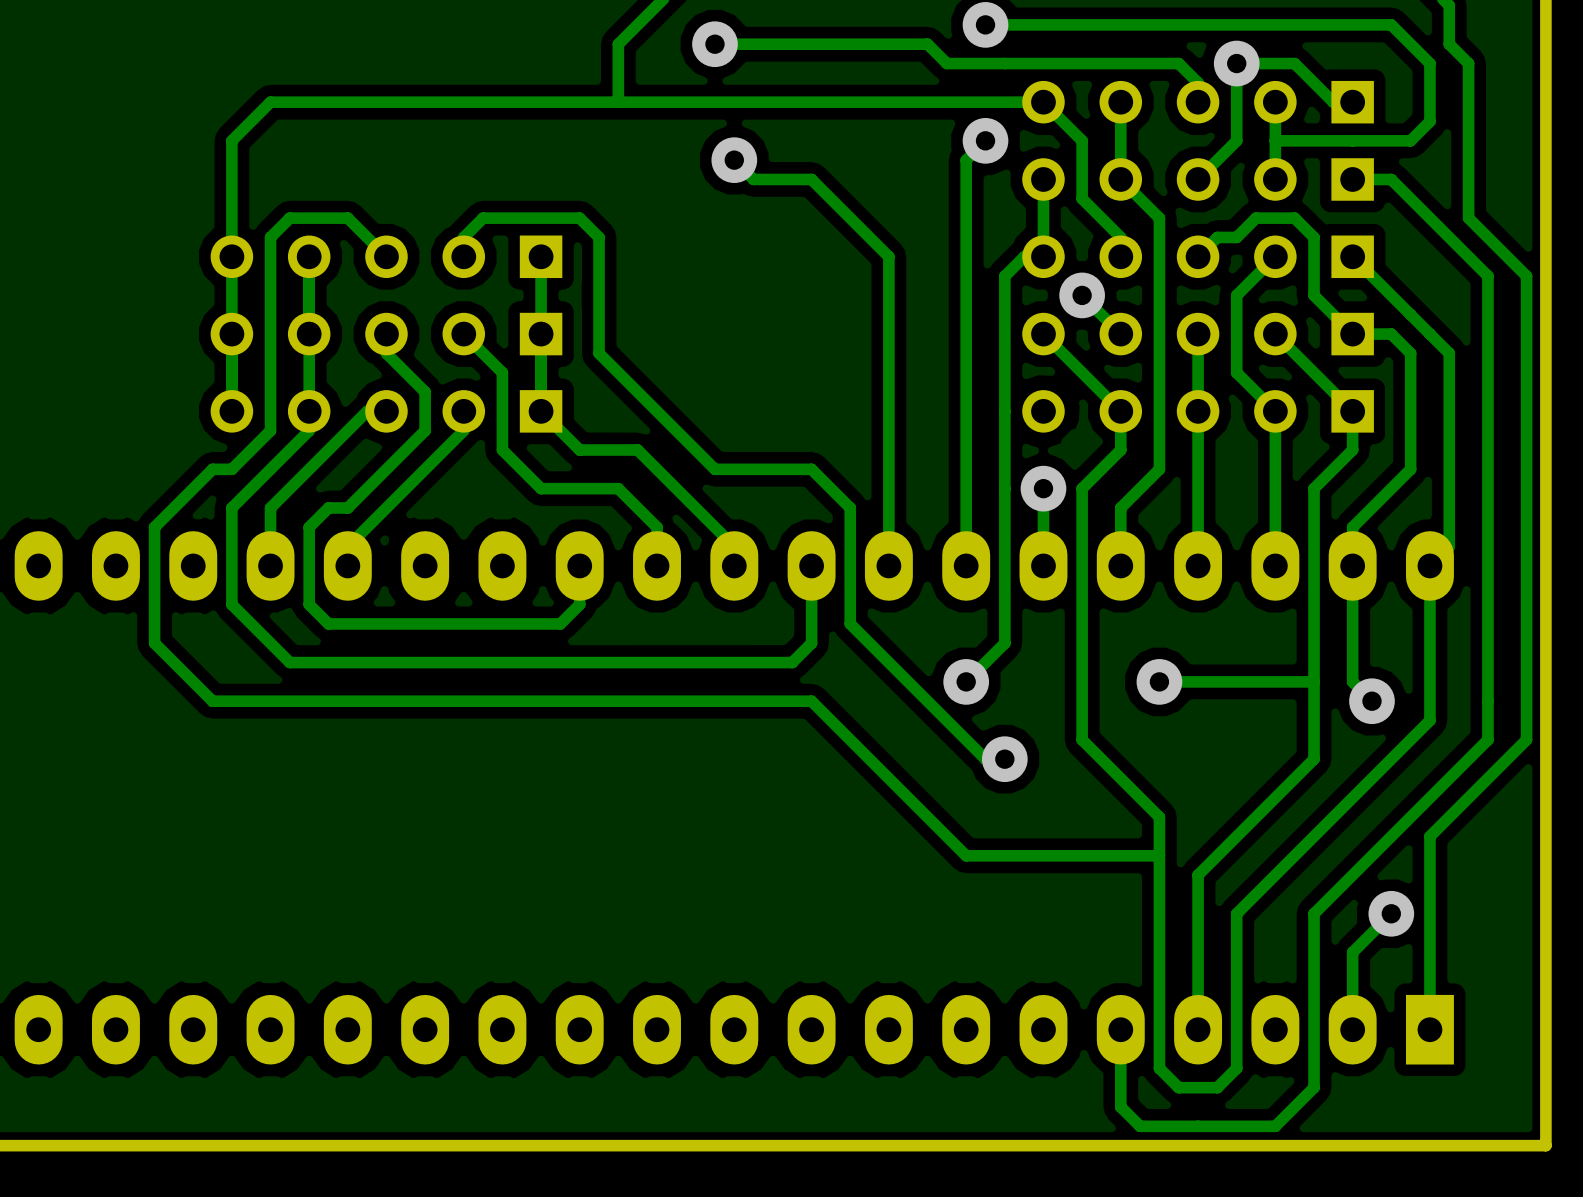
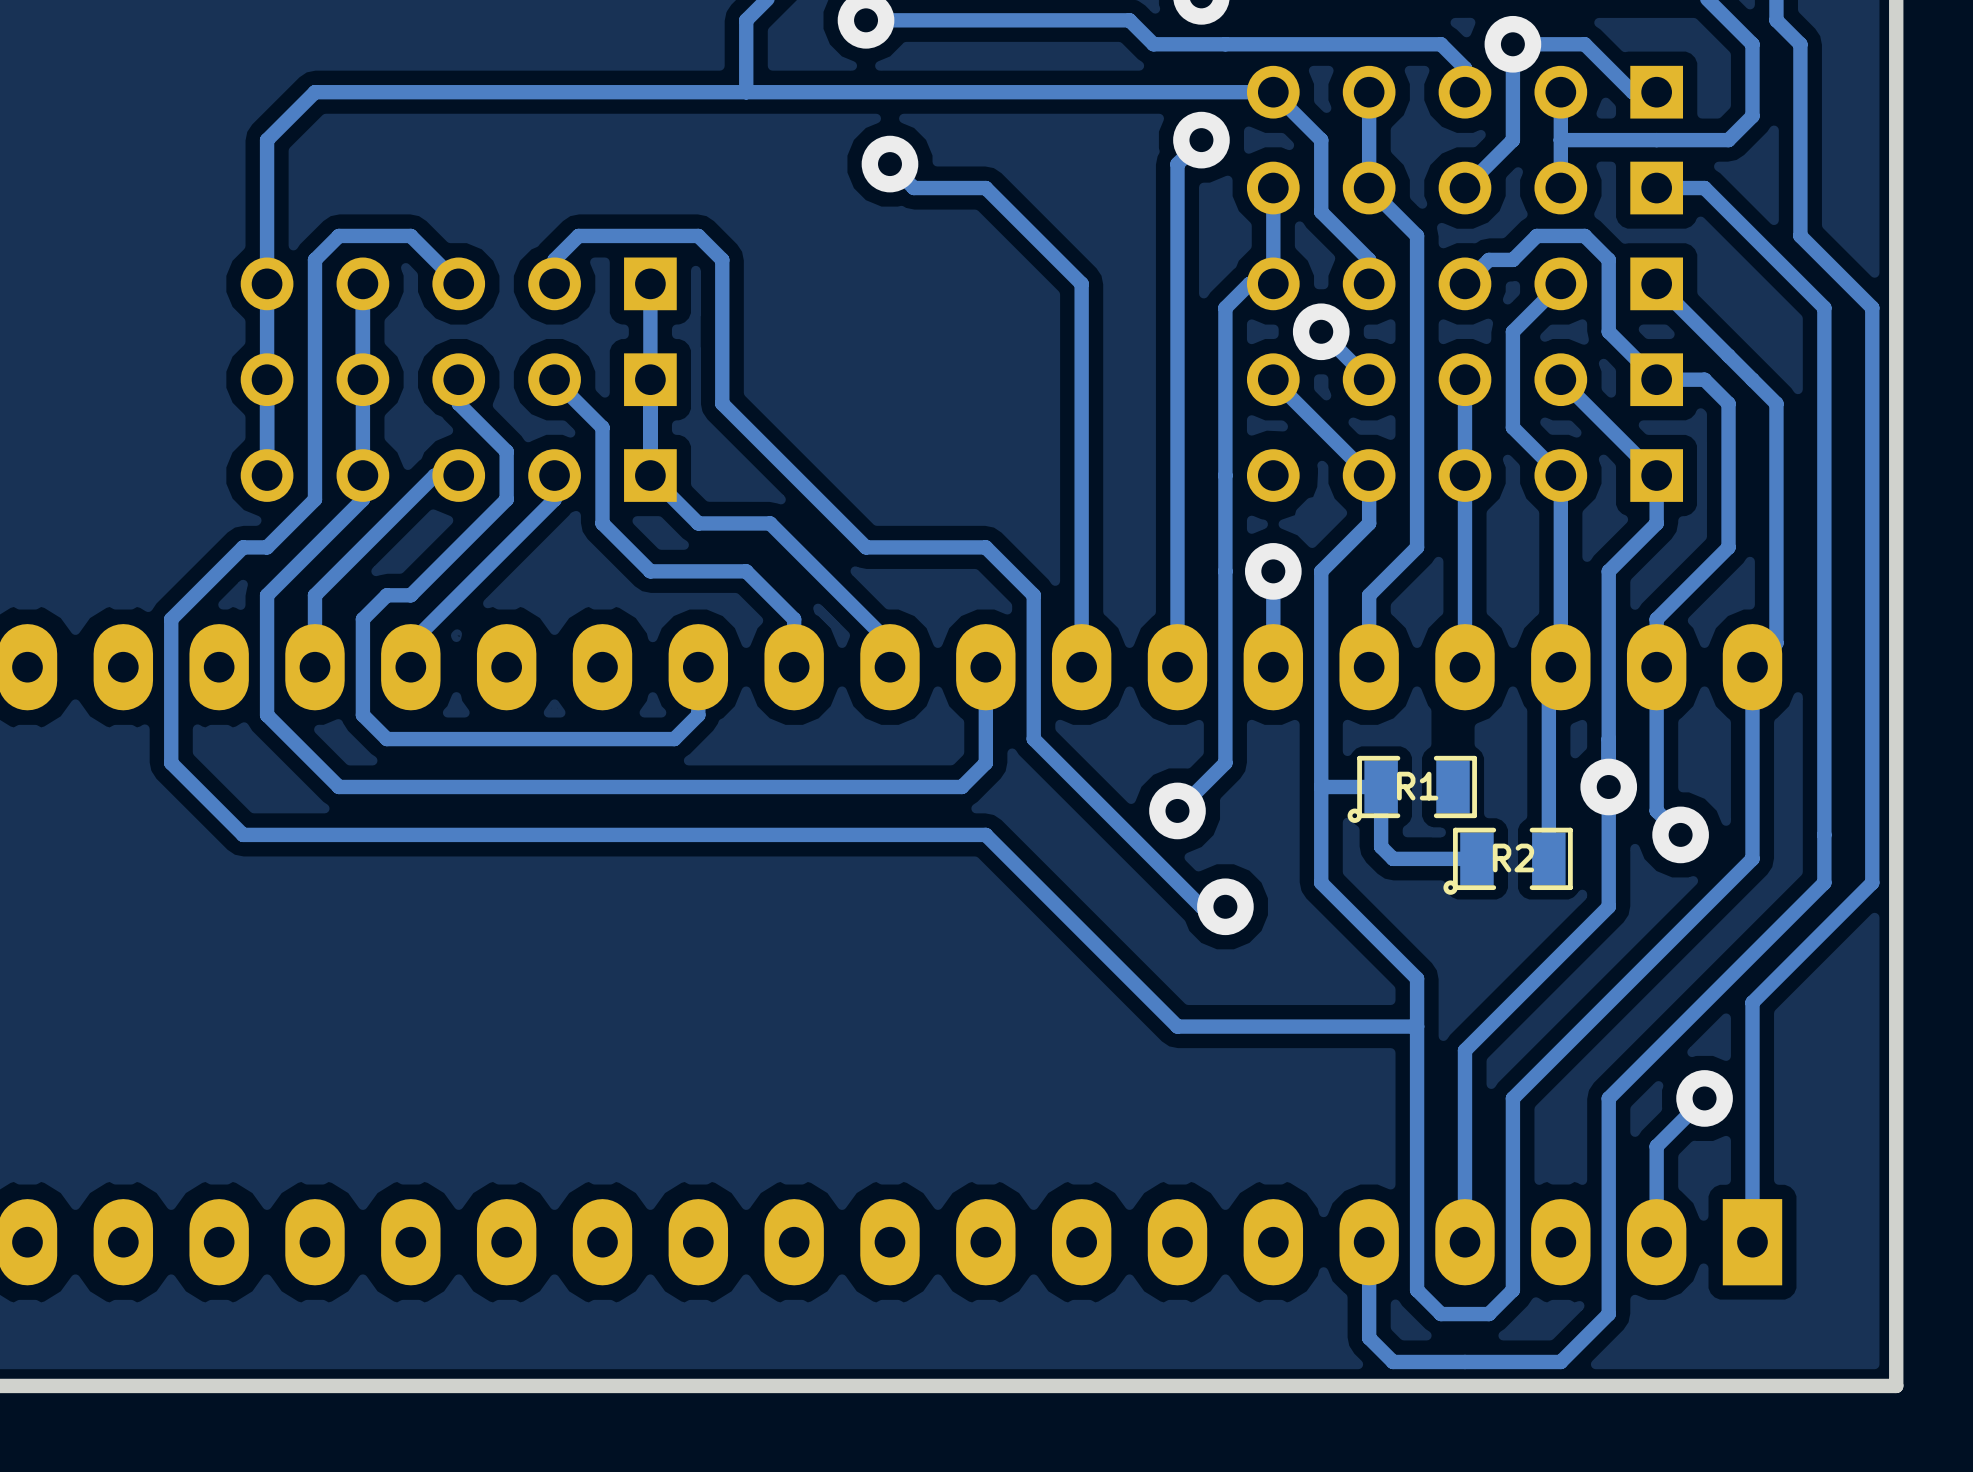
track: none -> (1560, 667) (1548, 679) (1548, 858)
track: none -> (1321, 786) (1381, 786) (1381, 846) (1393, 858) (1476, 858)
R1: none -> (1412, 789)
via position: (1159, 681) -> (1608, 786)
track: (1314, 681) (1159, 681) -> none
R2: none -> (1508, 861)

